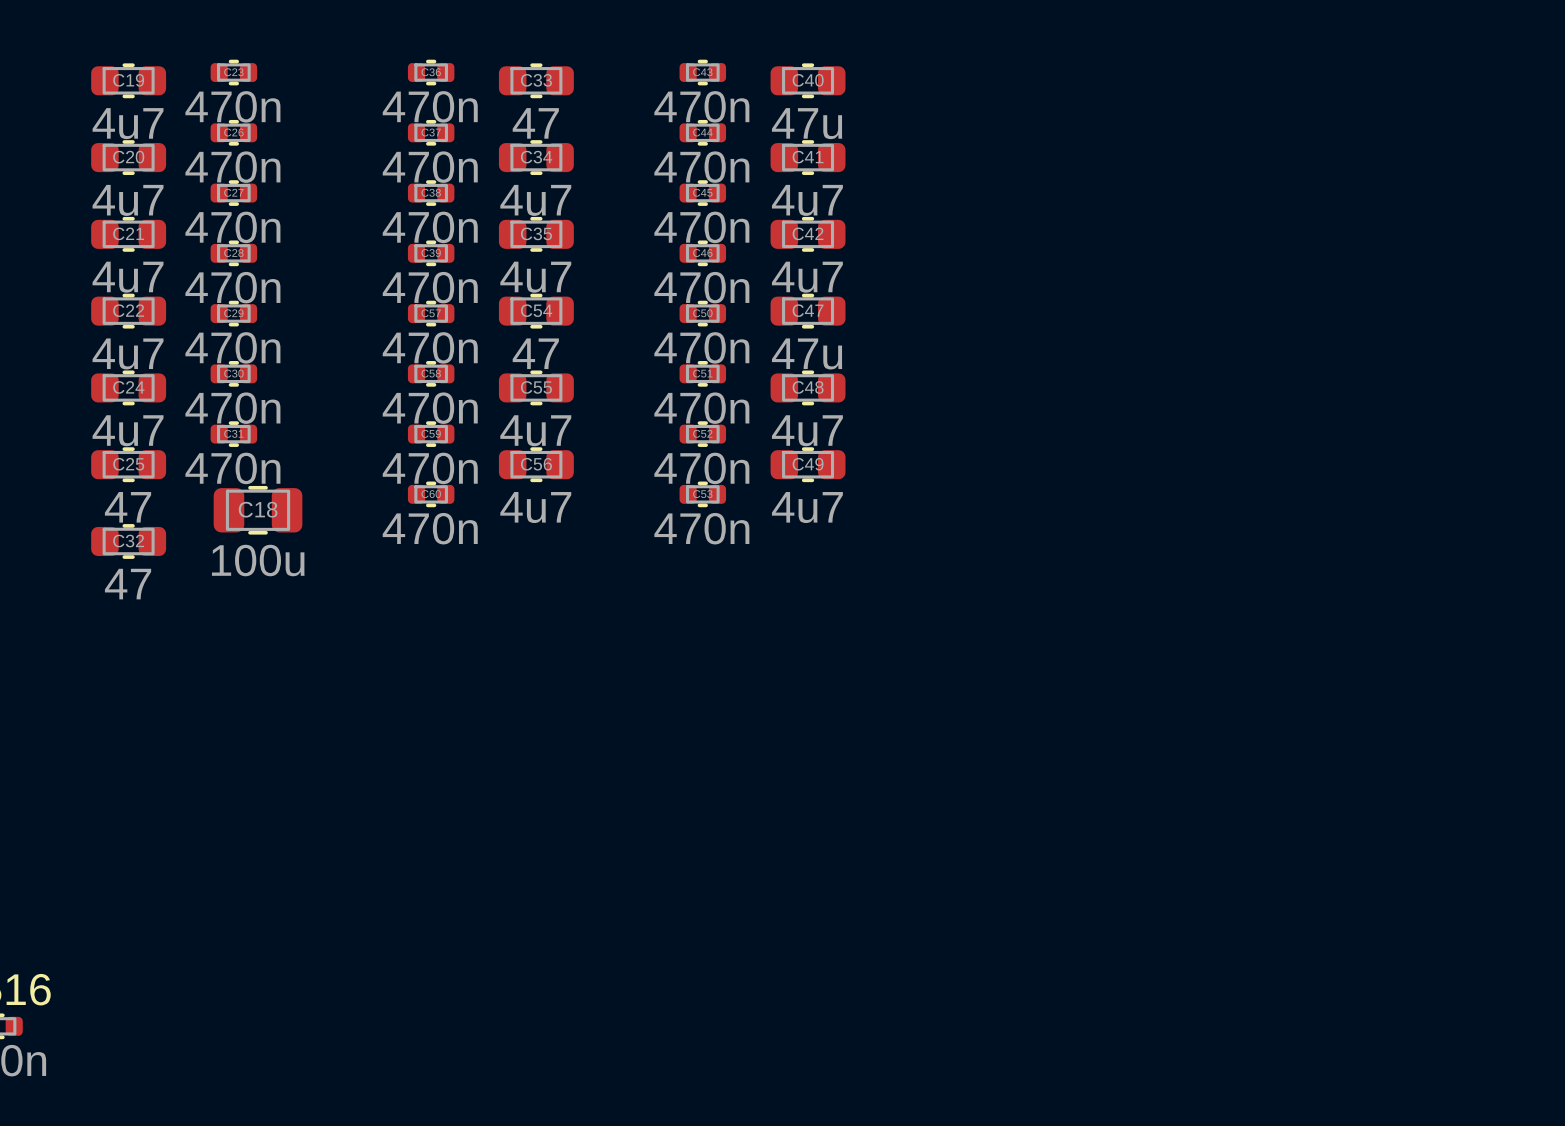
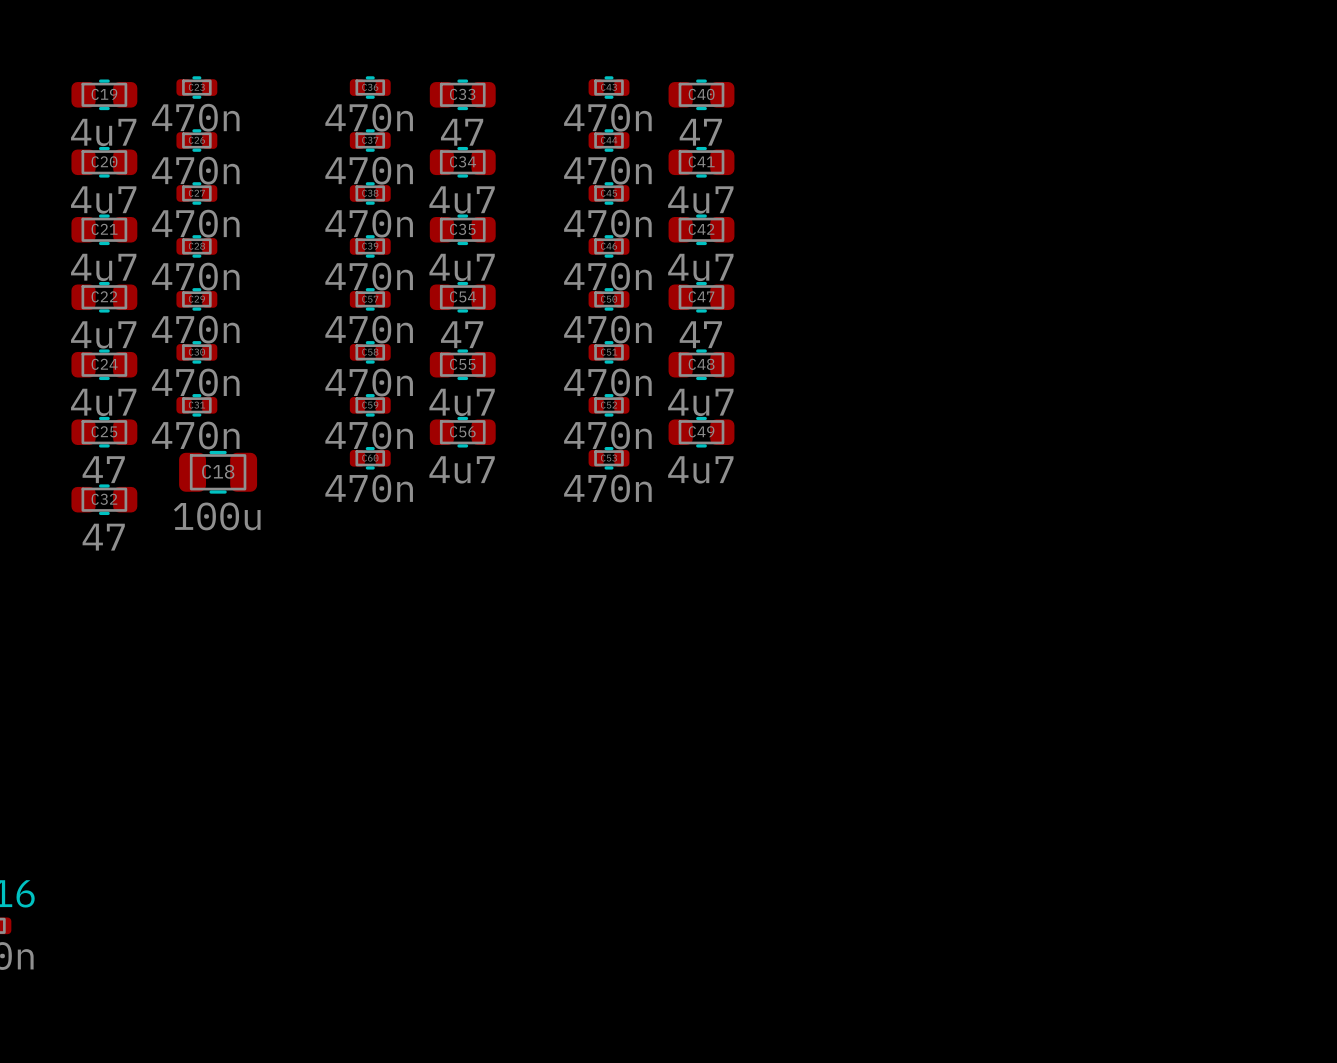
C40 value: 47u (807, 123) -> 47 (700, 132)
C47 value: 47u (807, 353) -> 47 (700, 334)

